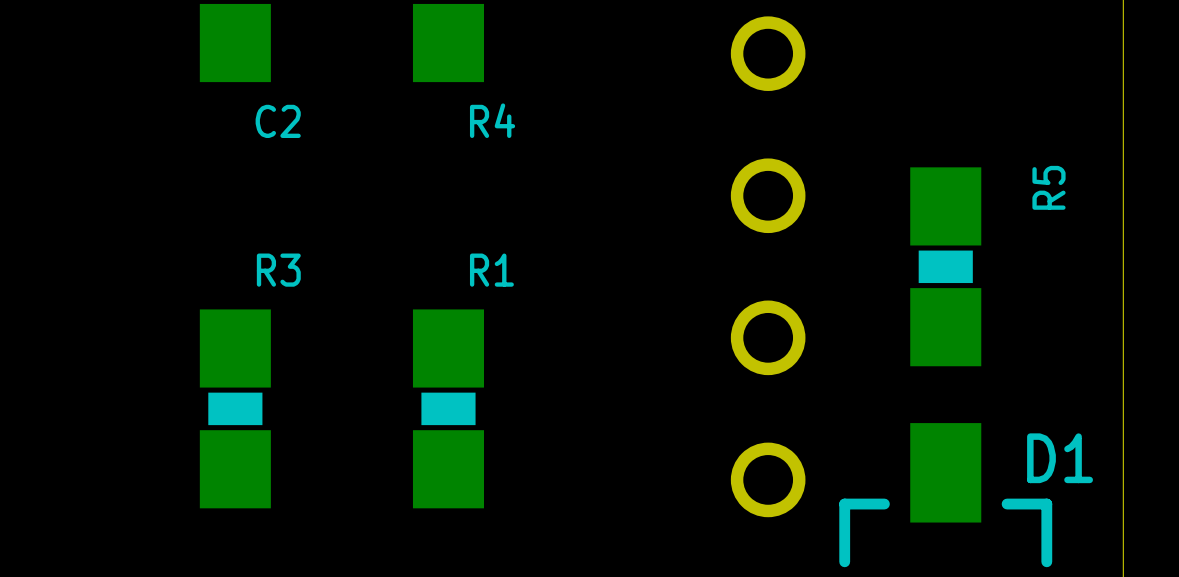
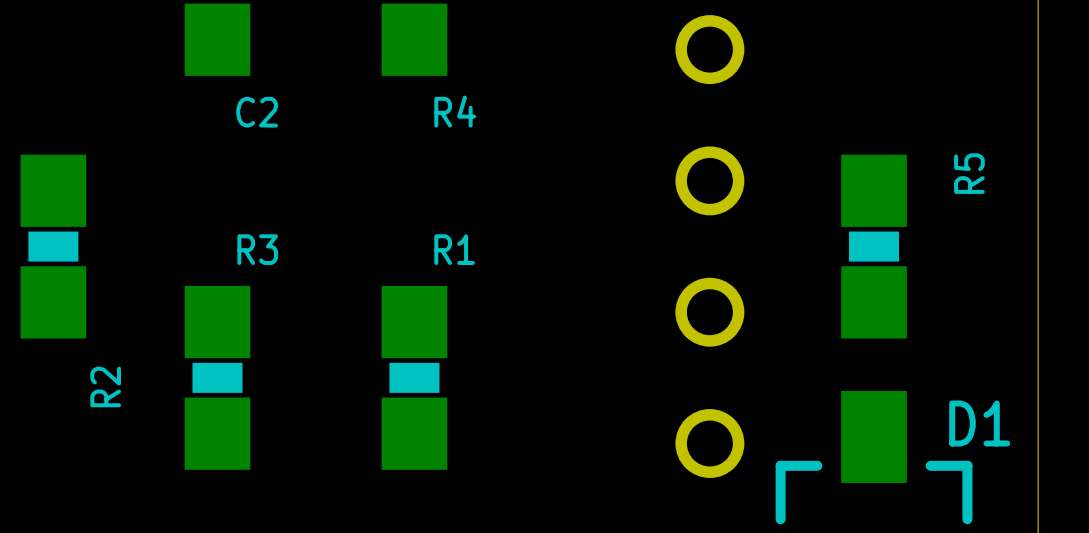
R2: none -> (53, 246)

